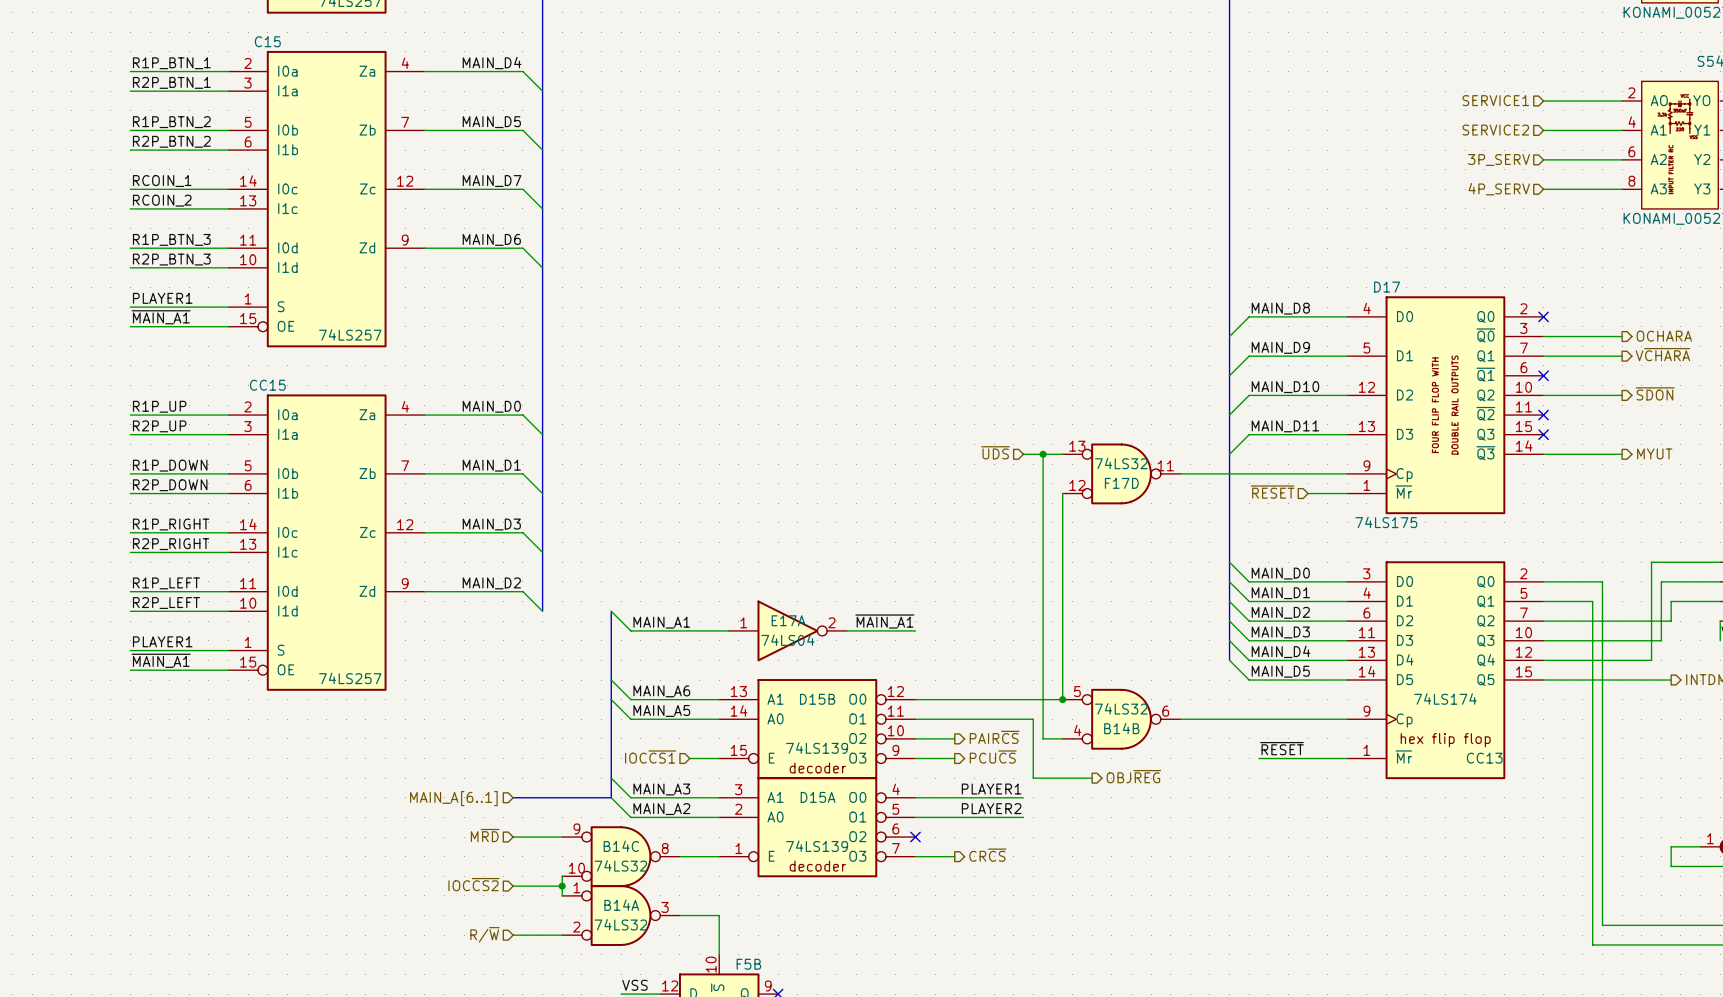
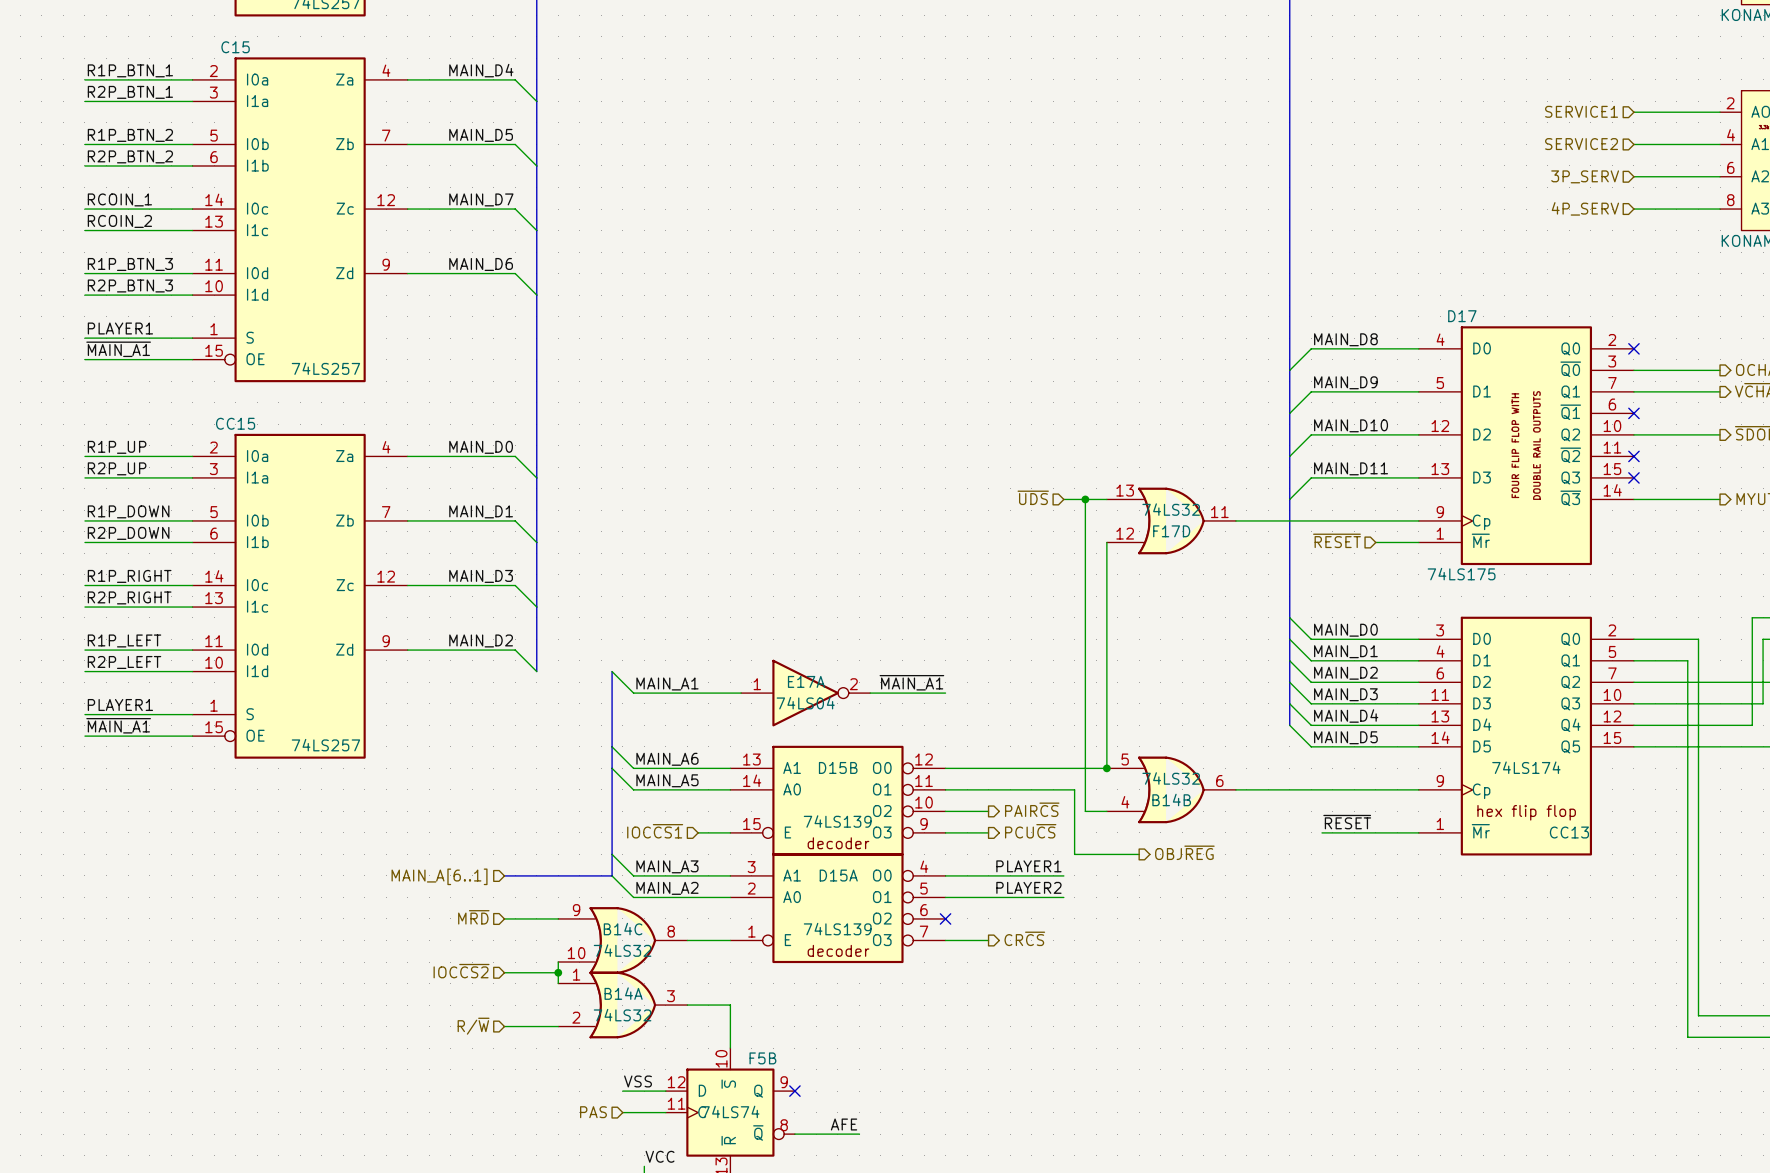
F17D symbol: [1062, 443, 1181, 505] -> [1106, 487, 1236, 555]
B14B symbol: [1062, 688, 1181, 750] -> [1106, 756, 1236, 824]
B14C symbol: [562, 826, 680, 888] -> [558, 907, 688, 974]
B14A symbol: [562, 885, 680, 946] -> [558, 971, 688, 1039]

